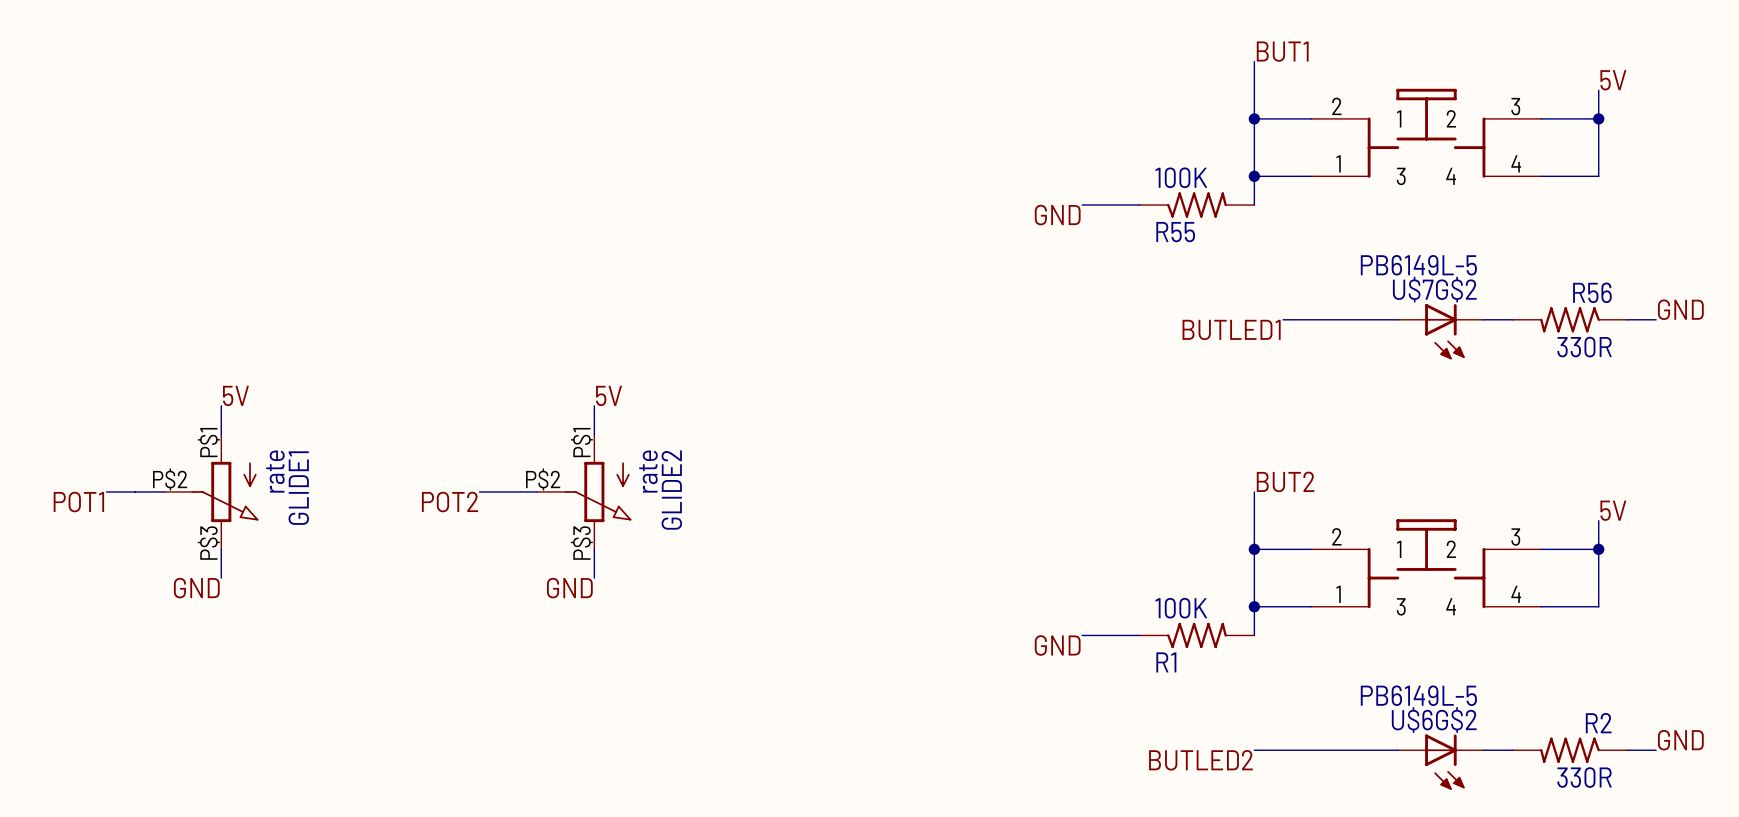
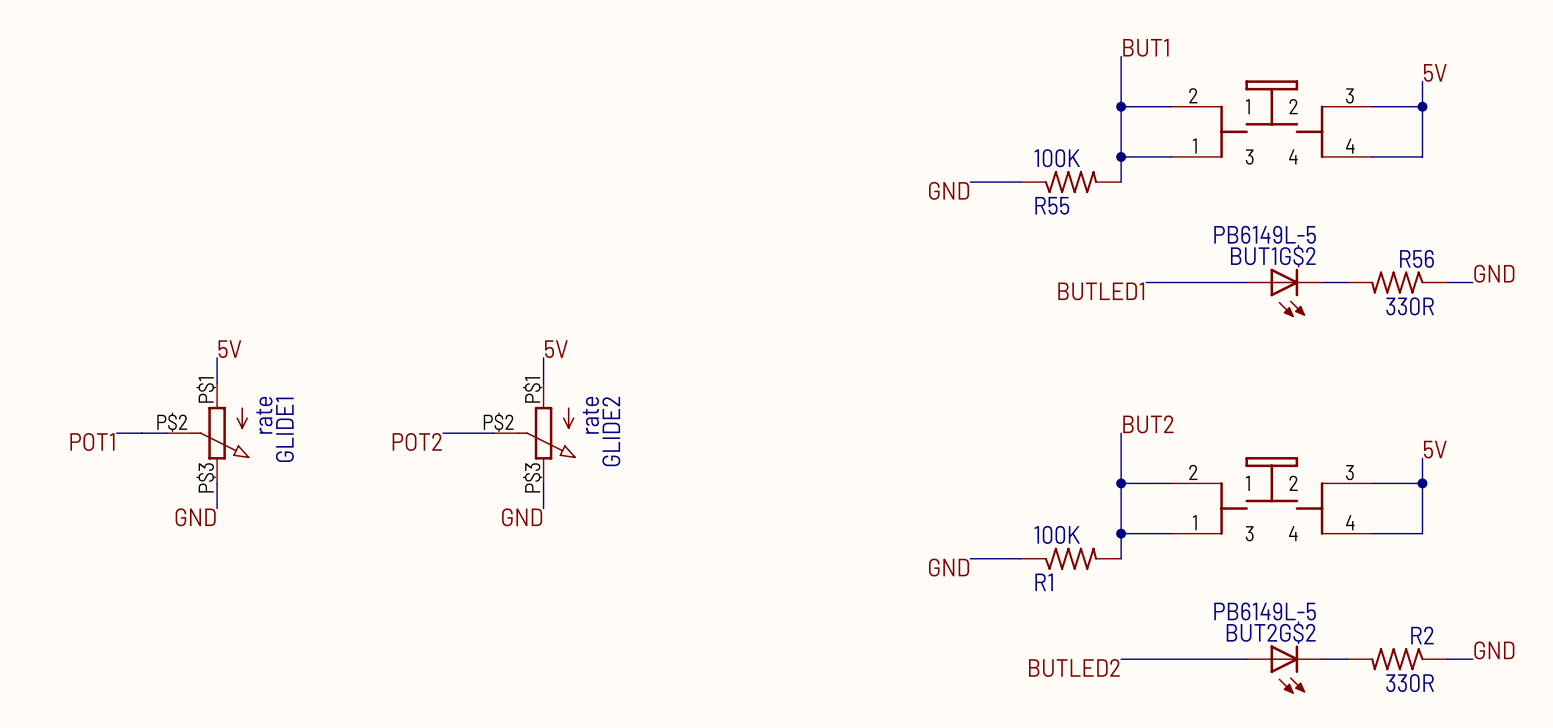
U$7G$2 name: U$7G$2 (1434, 289) -> BUT1G$2 (1273, 256)
U$6G$2 name: U$6G$2 (1434, 720) -> BUT2G$2 (1271, 632)

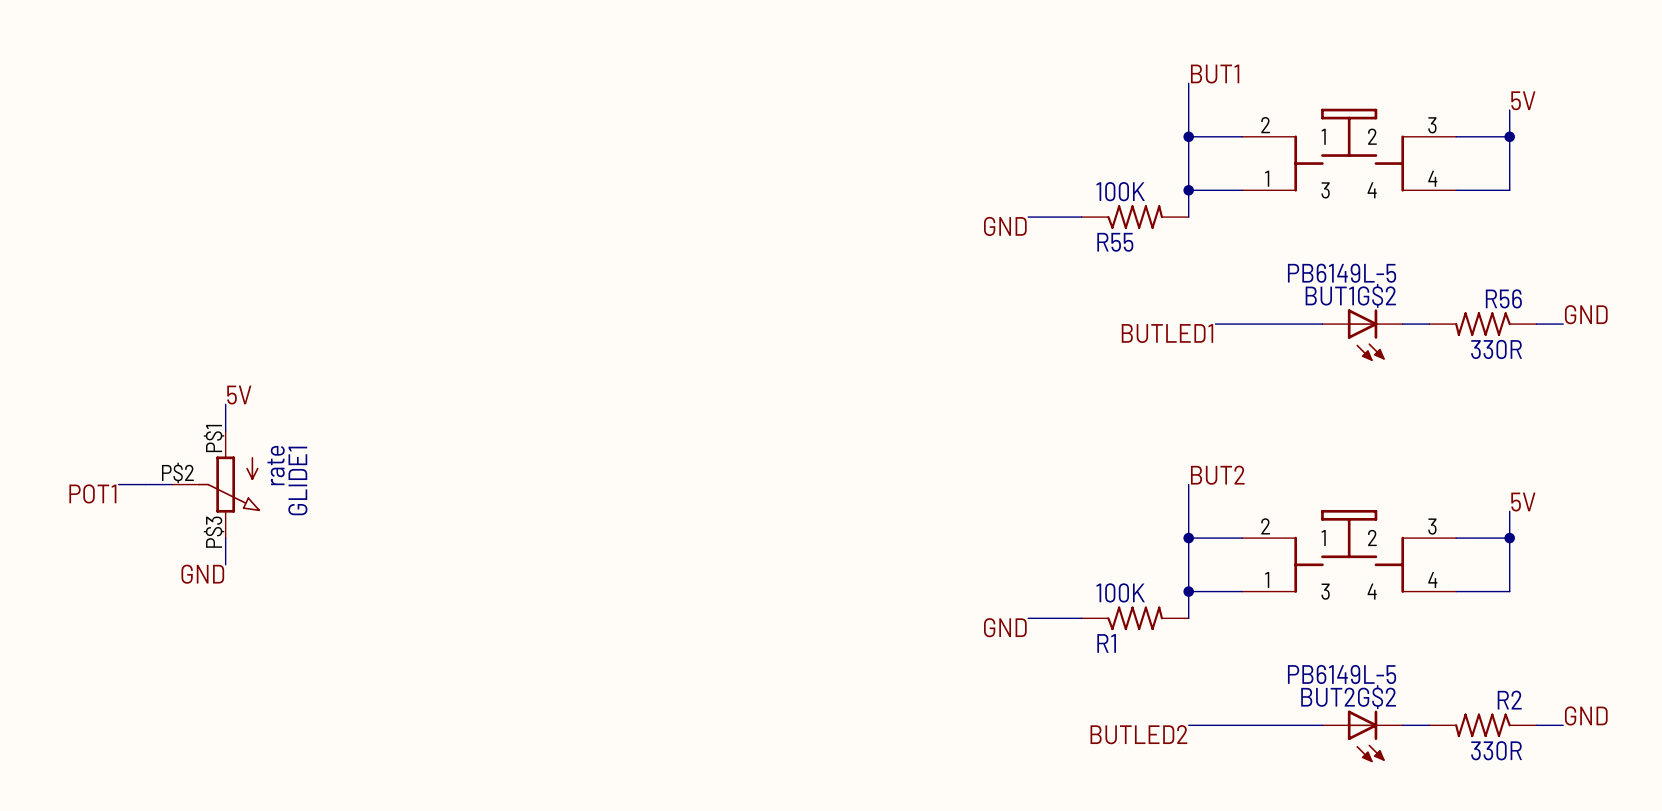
label: 5V (556, 349) -> none
wire: (543, 357) (543, 382) -> none
wire: (443, 433) (493, 433) -> none
GLIDE2: rate (534, 433) -> none
label: POT2 (417, 441) -> none
wire: (543, 483) (543, 508) -> none
label: GND (522, 517) -> none

